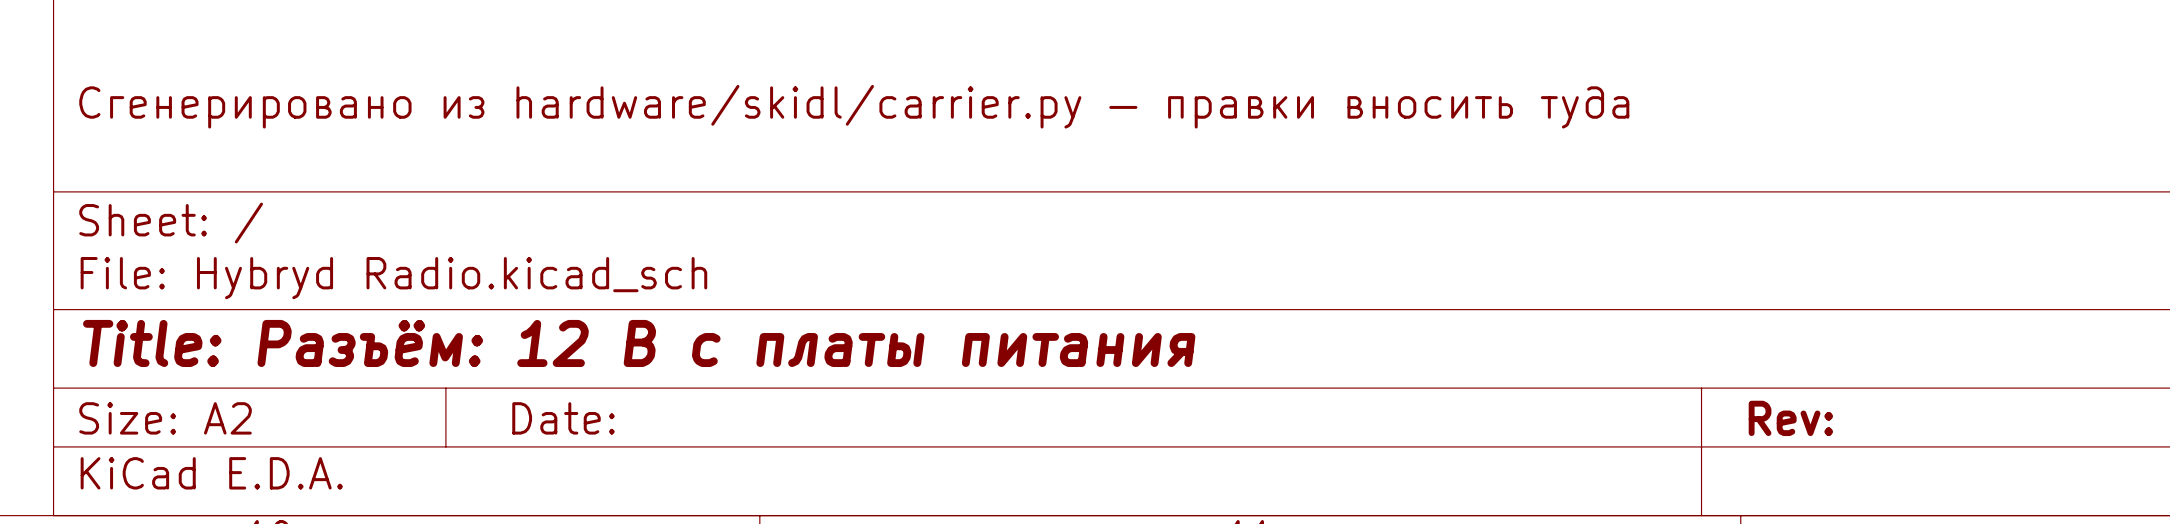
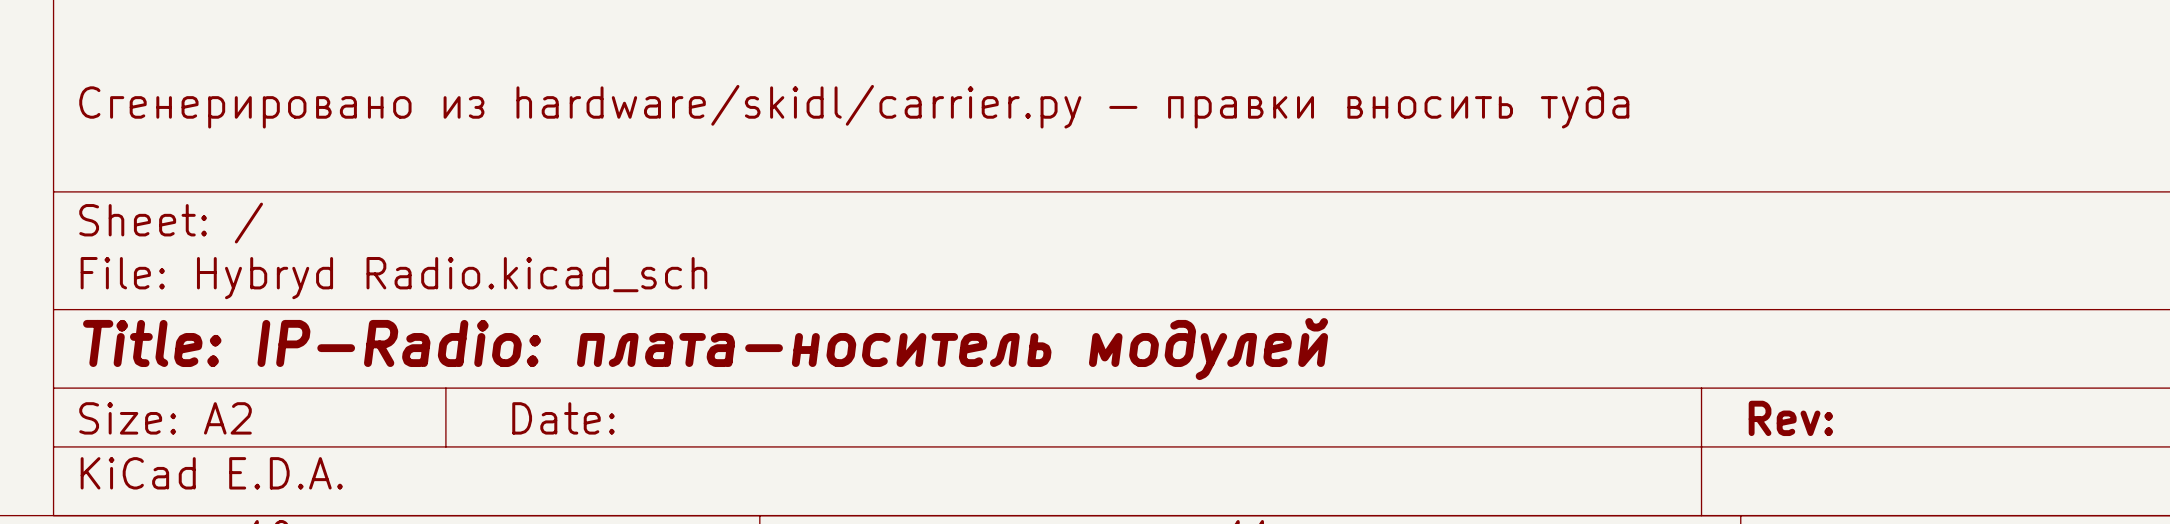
title block: Title: Разъём: 12 В с платы питания (639, 343) -> Title: IP-Radio: плата-носитель модулей (705, 349)

